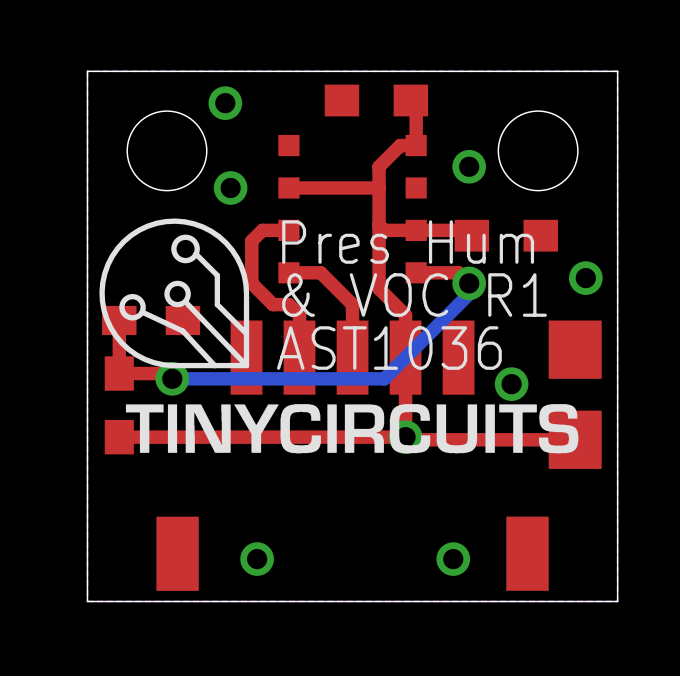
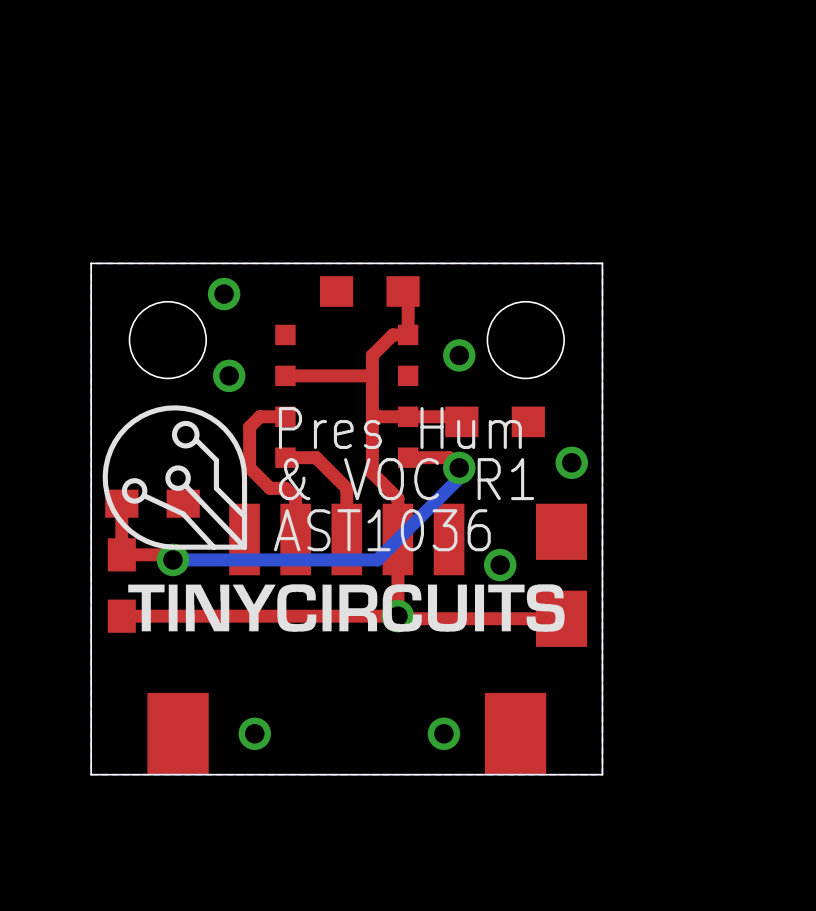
part footprint: [156, 320, 549, 591] -> [147, 503, 547, 775]

